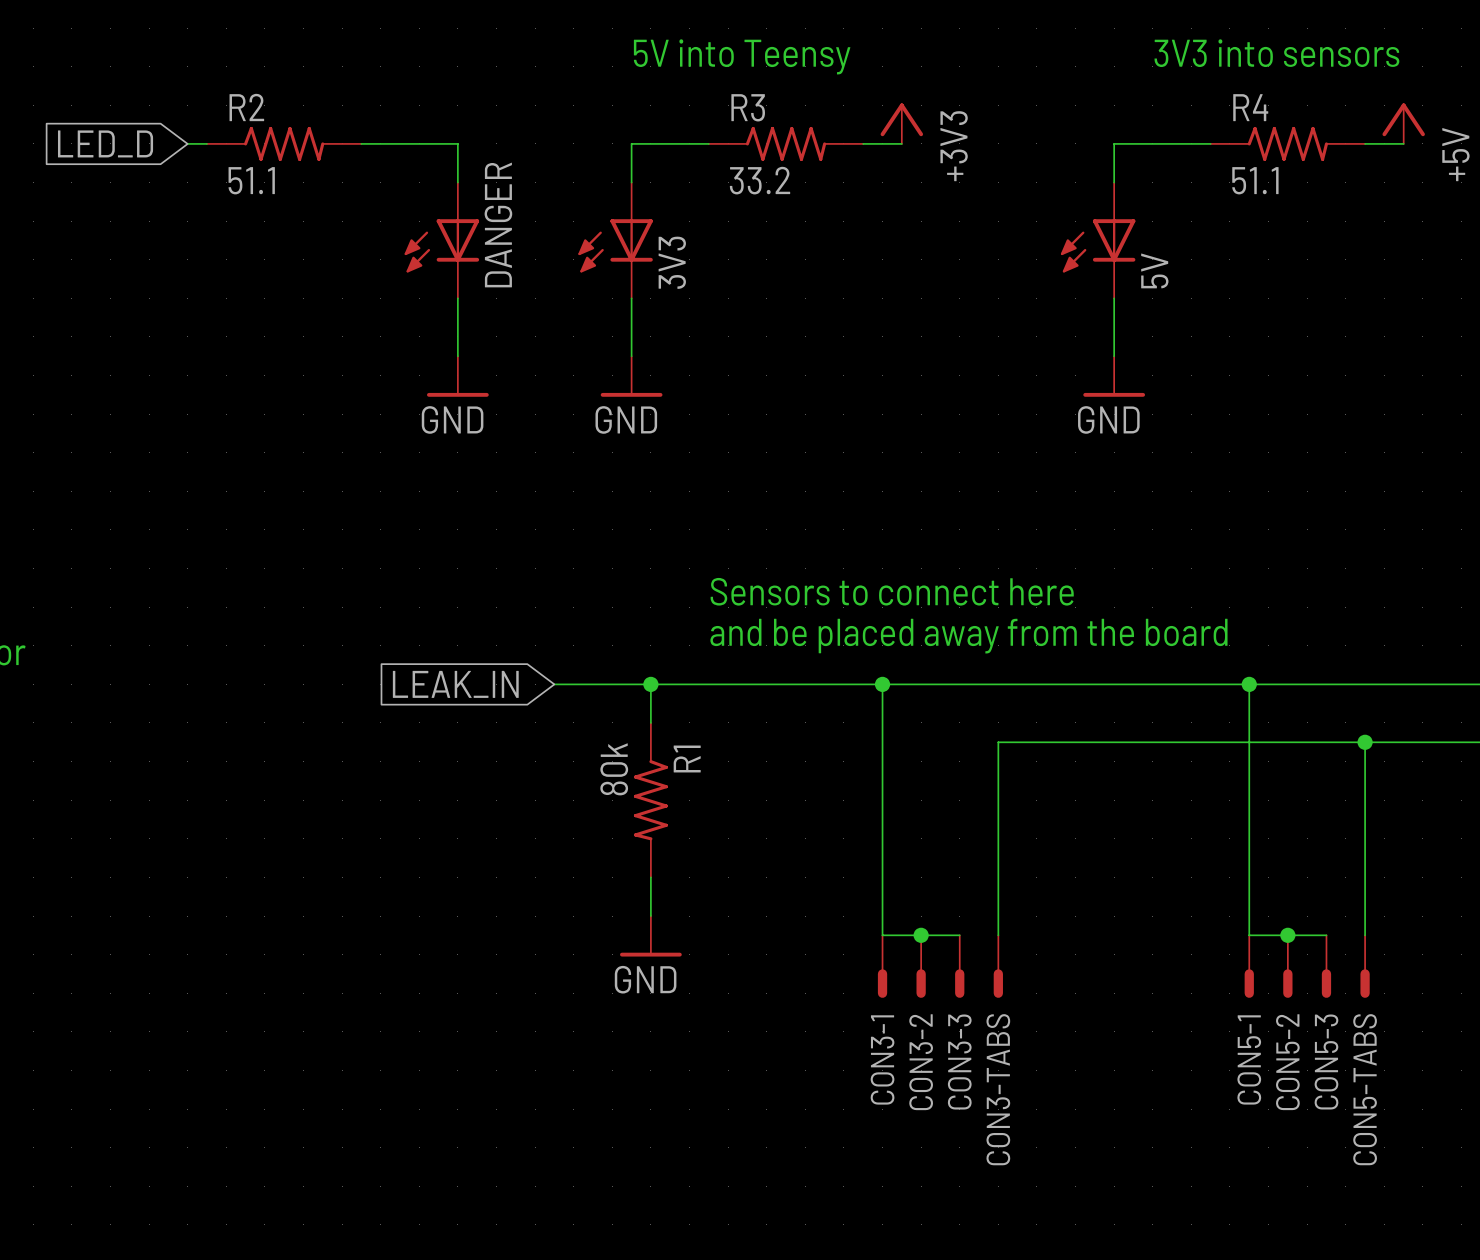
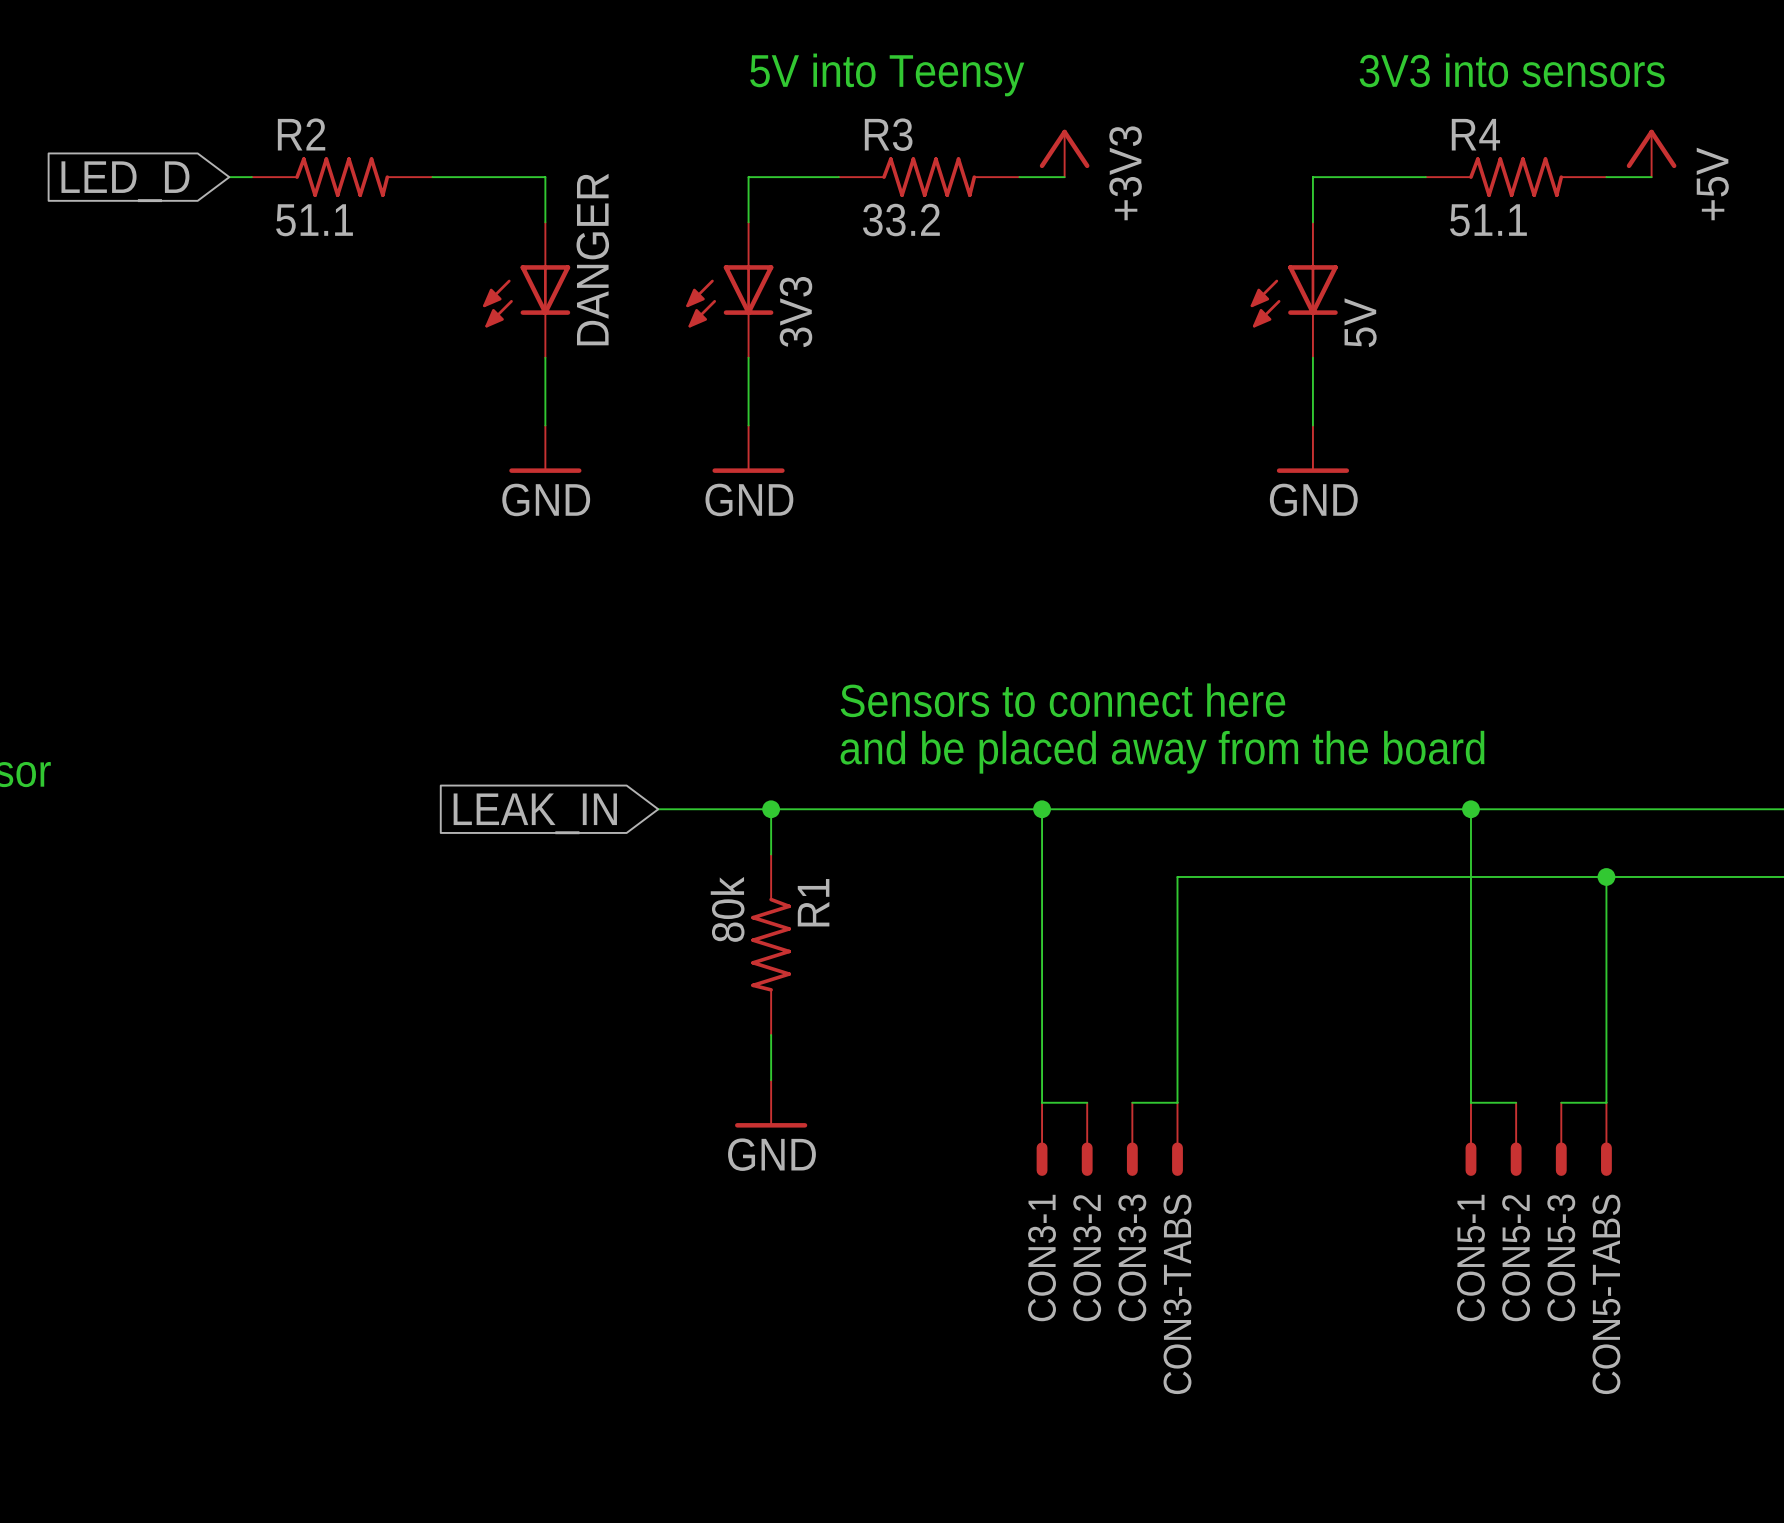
wire: (921, 935) (959, 935) -> (1177, 1102) (1132, 1102)
junction: (921, 935) -> none
wire: (1287, 935) (1326, 935) -> (1606, 1102) (1561, 1102)
junction: (1287, 935) -> none

